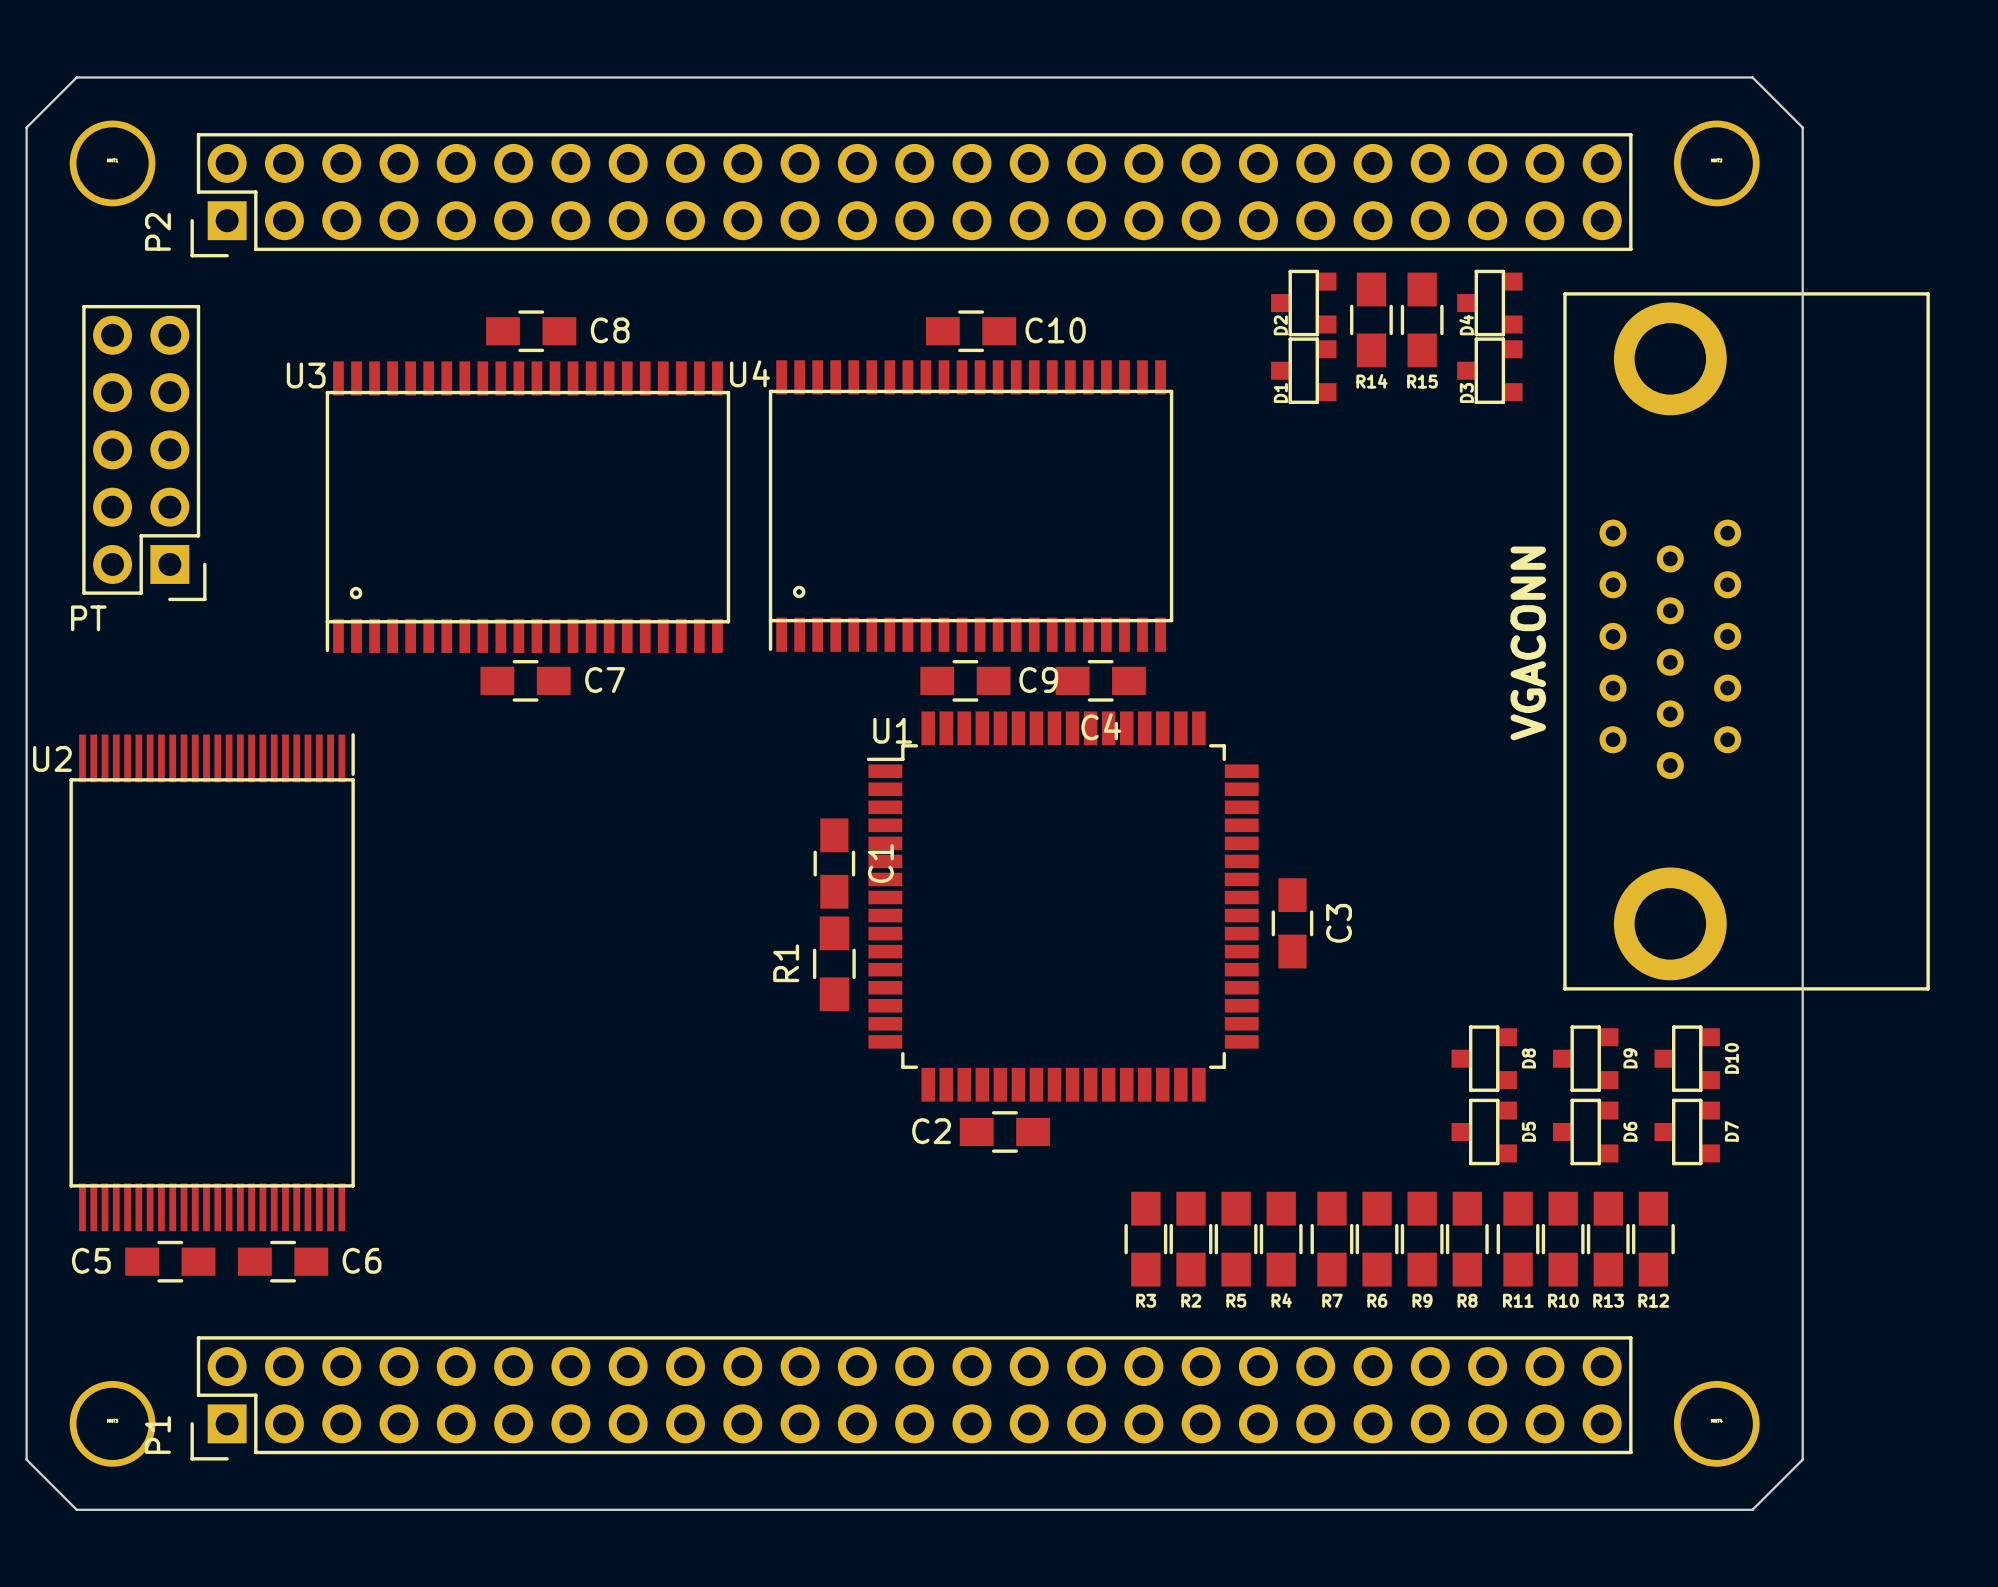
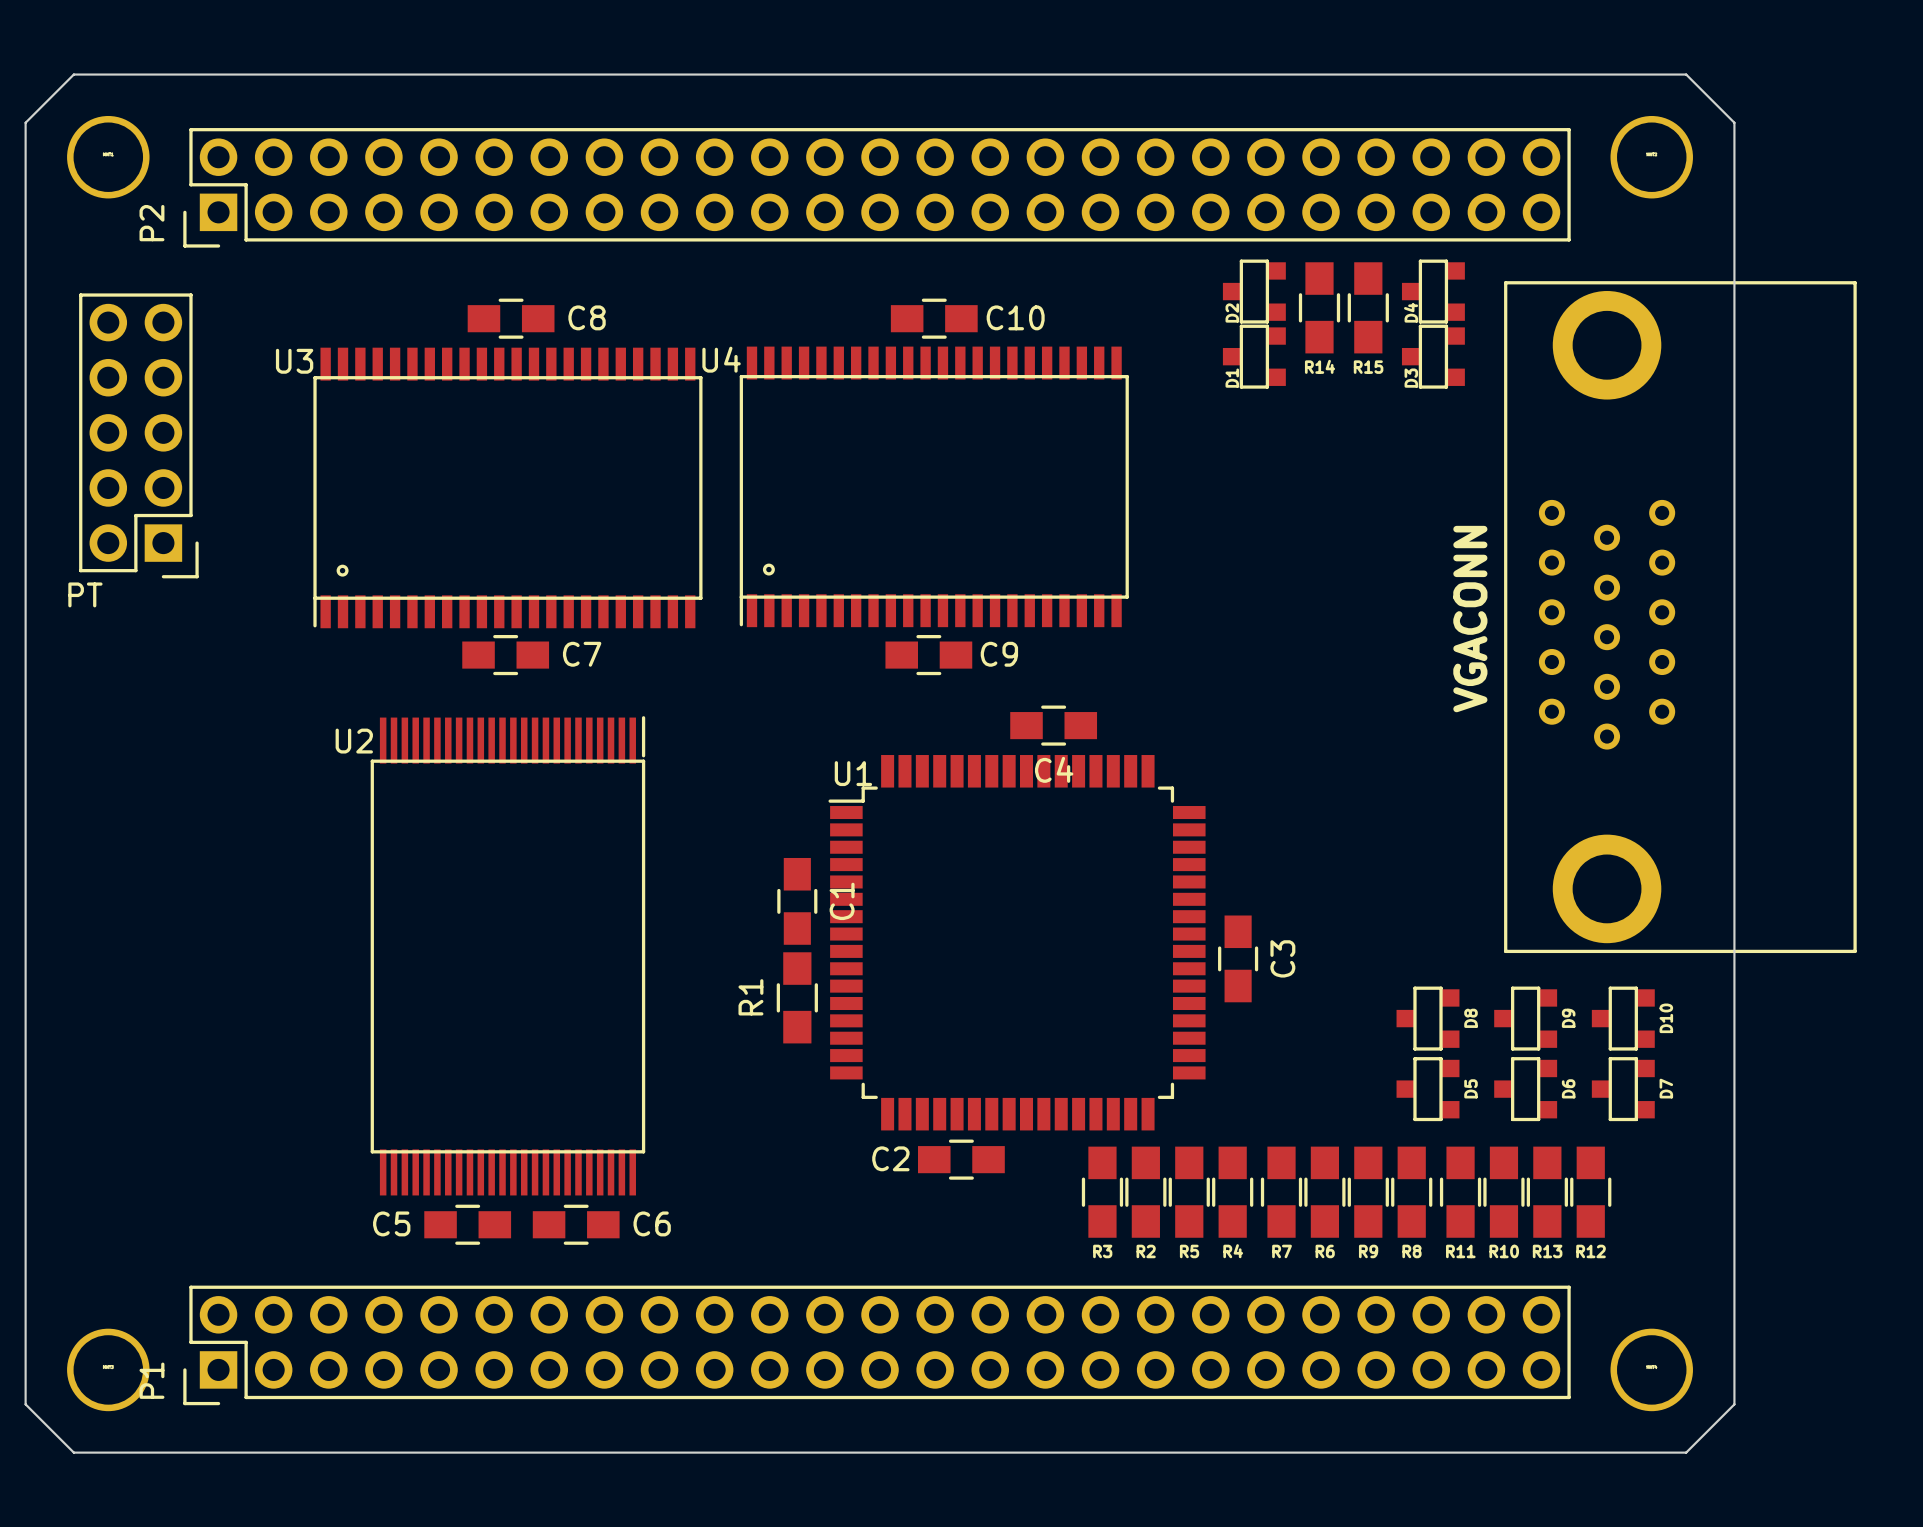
C4 position: (1100, 680) -> (1053, 725)
C1 position: (834, 863) -> (797, 901)
U1 position: (1062, 906) -> (1017, 942)
C3 position: (1292, 923) -> (1238, 958)
R1 position: (834, 963) -> (797, 997)
U2 position: (212, 982) -> (507, 955)
C2 position: (1004, 1131) -> (961, 1159)
C5 position: (170, 1261) -> (467, 1224)
C6 position: (283, 1261) -> (576, 1224)

